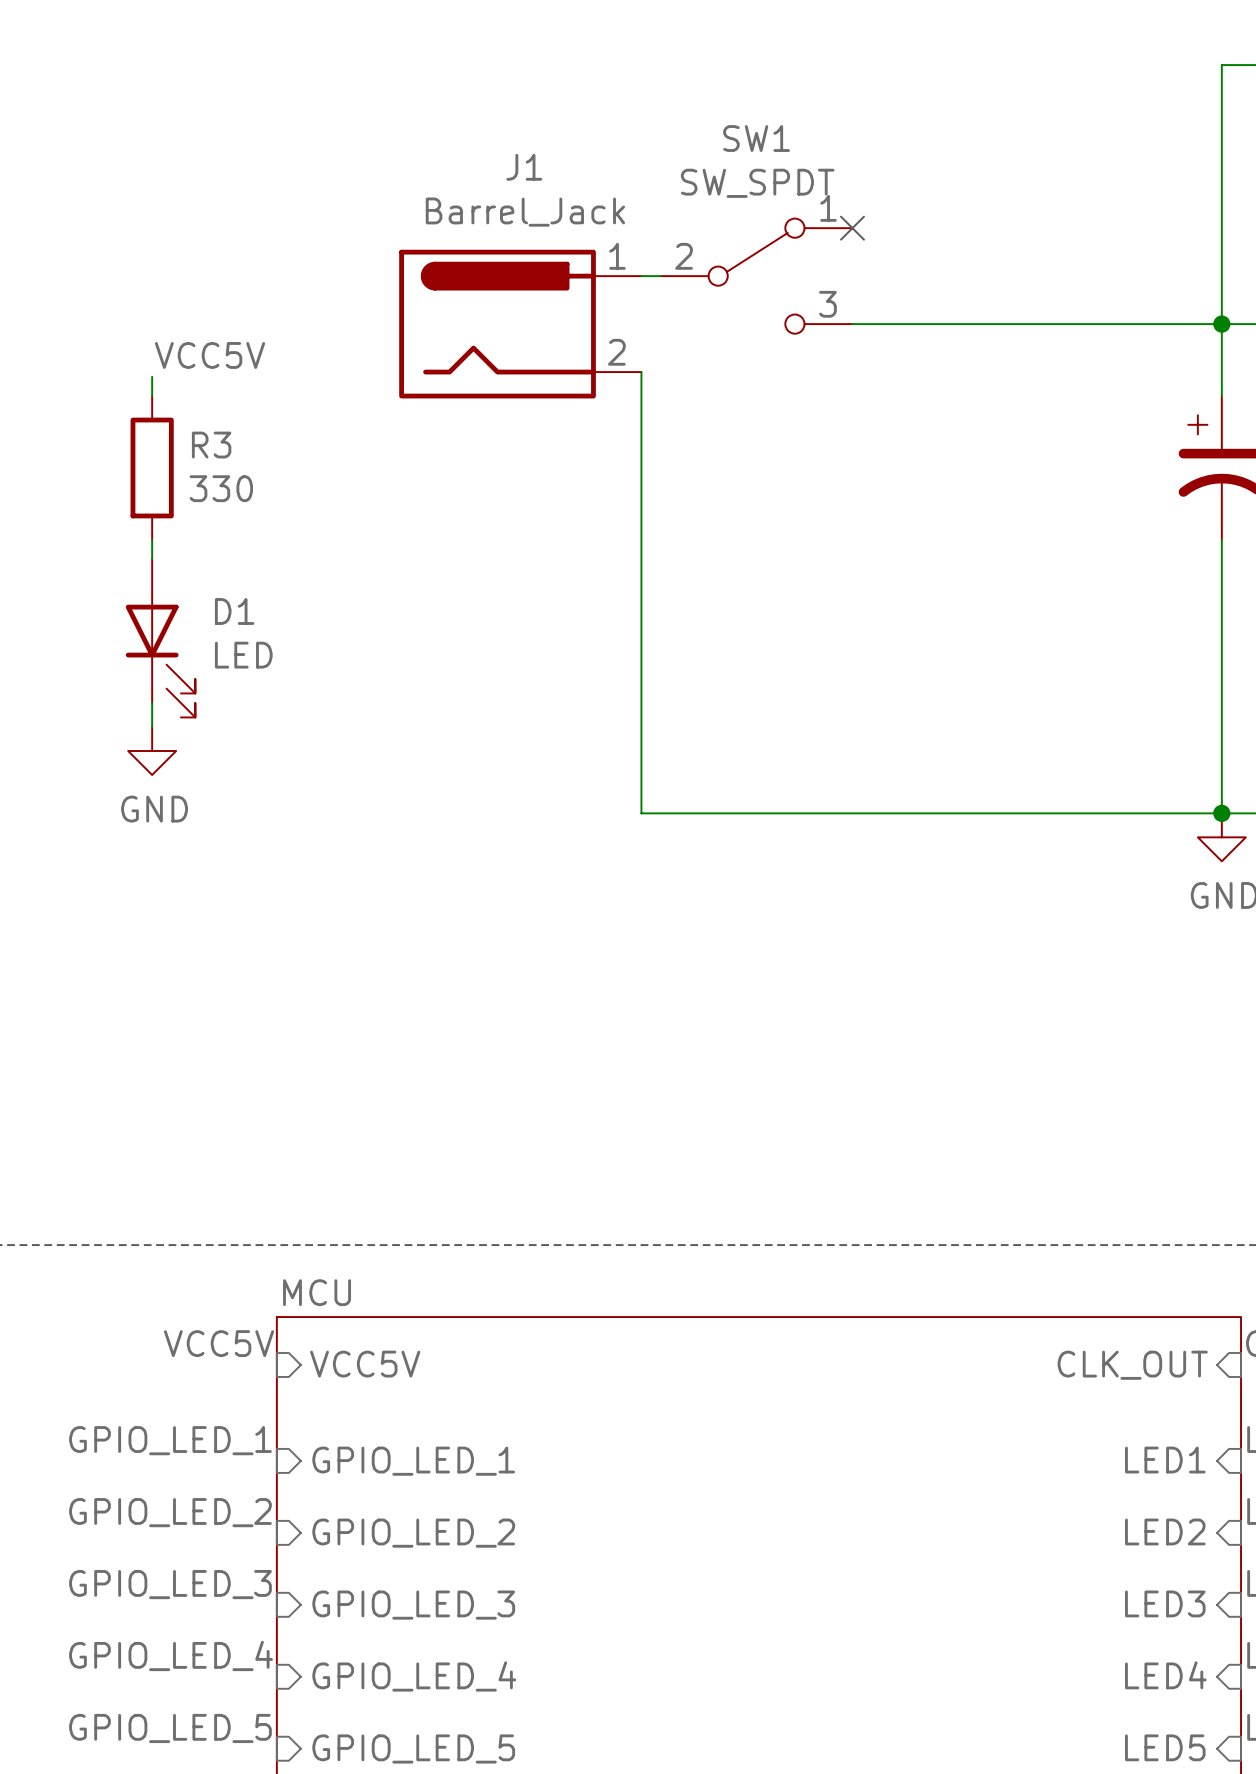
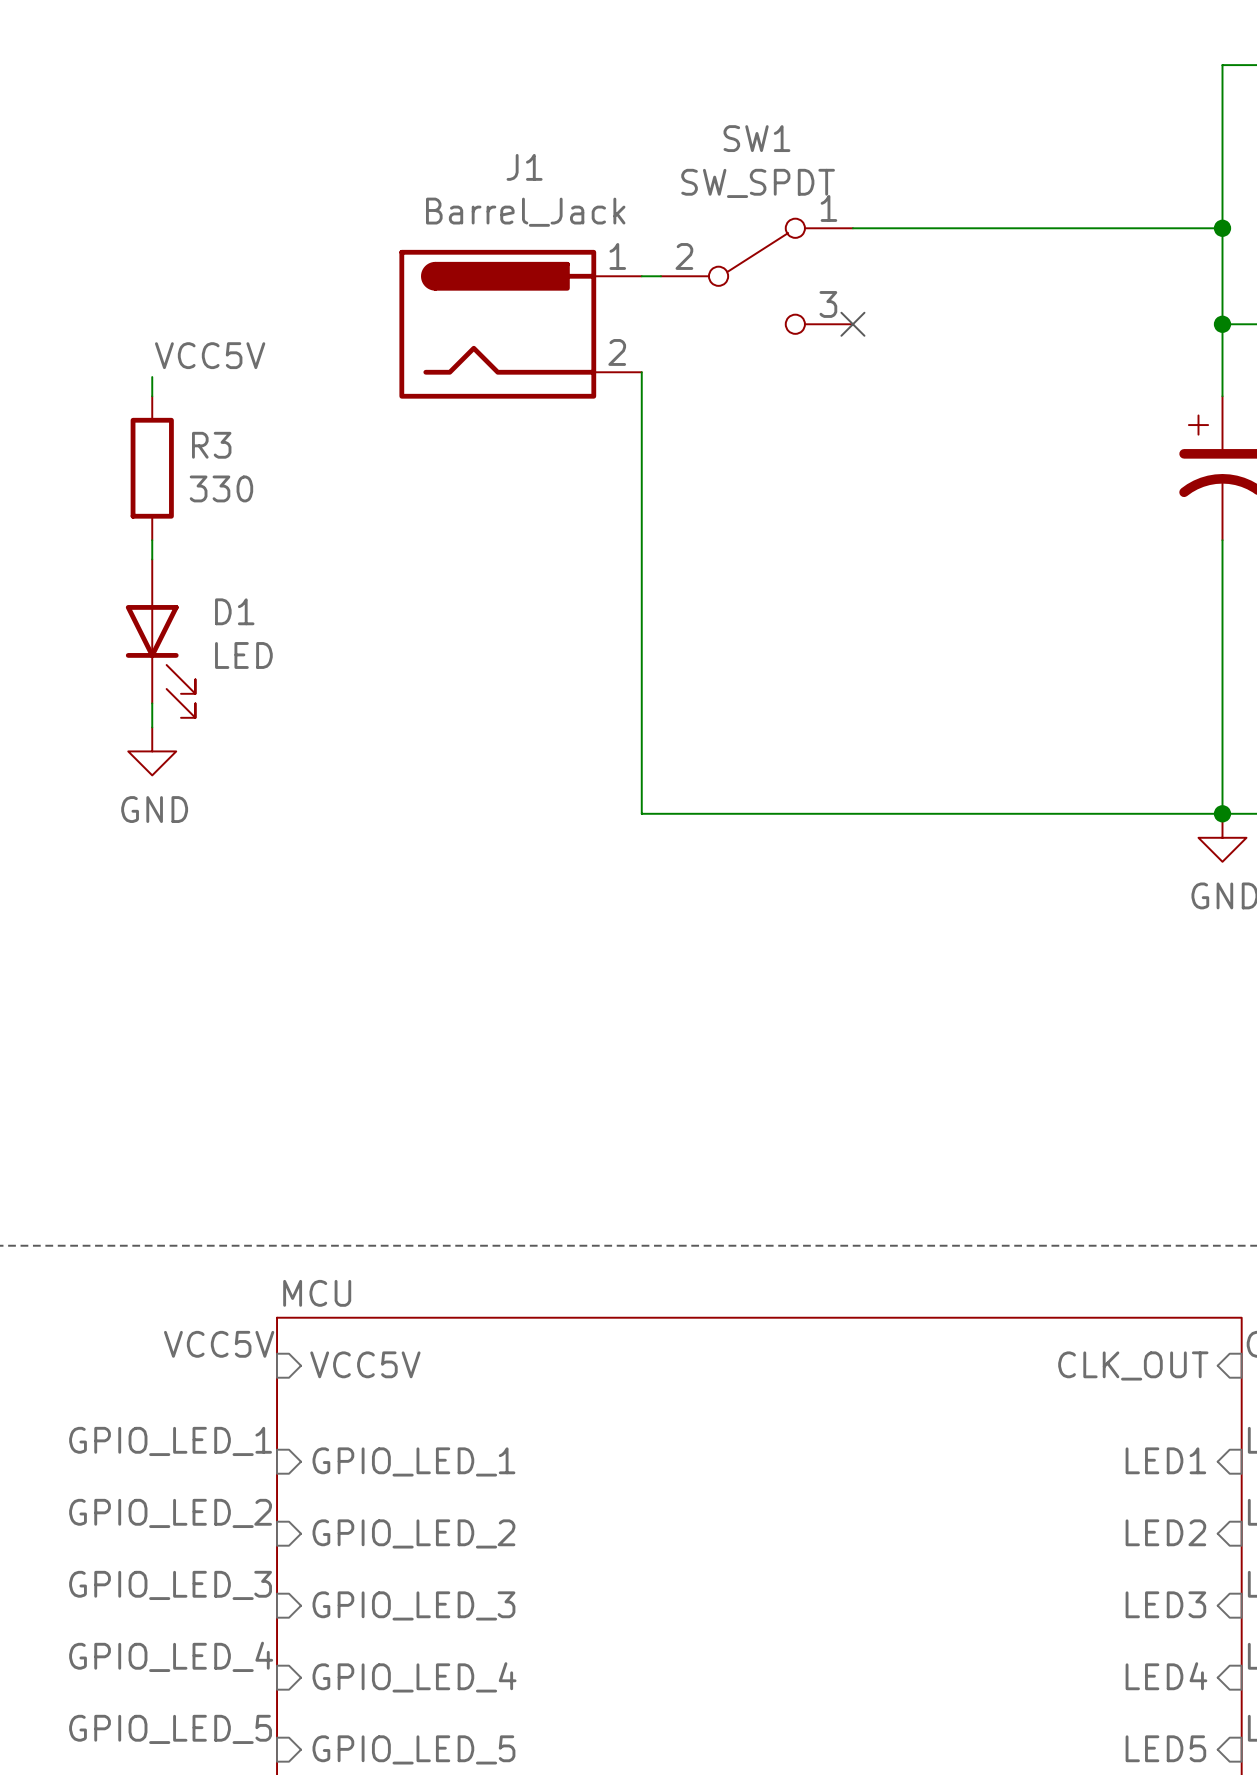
no-connect mark position: (852, 228) -> (852, 324)
junction: none -> (1222, 228)
wire: (852, 324) (1221, 324) -> (852, 228) (1222, 228)

